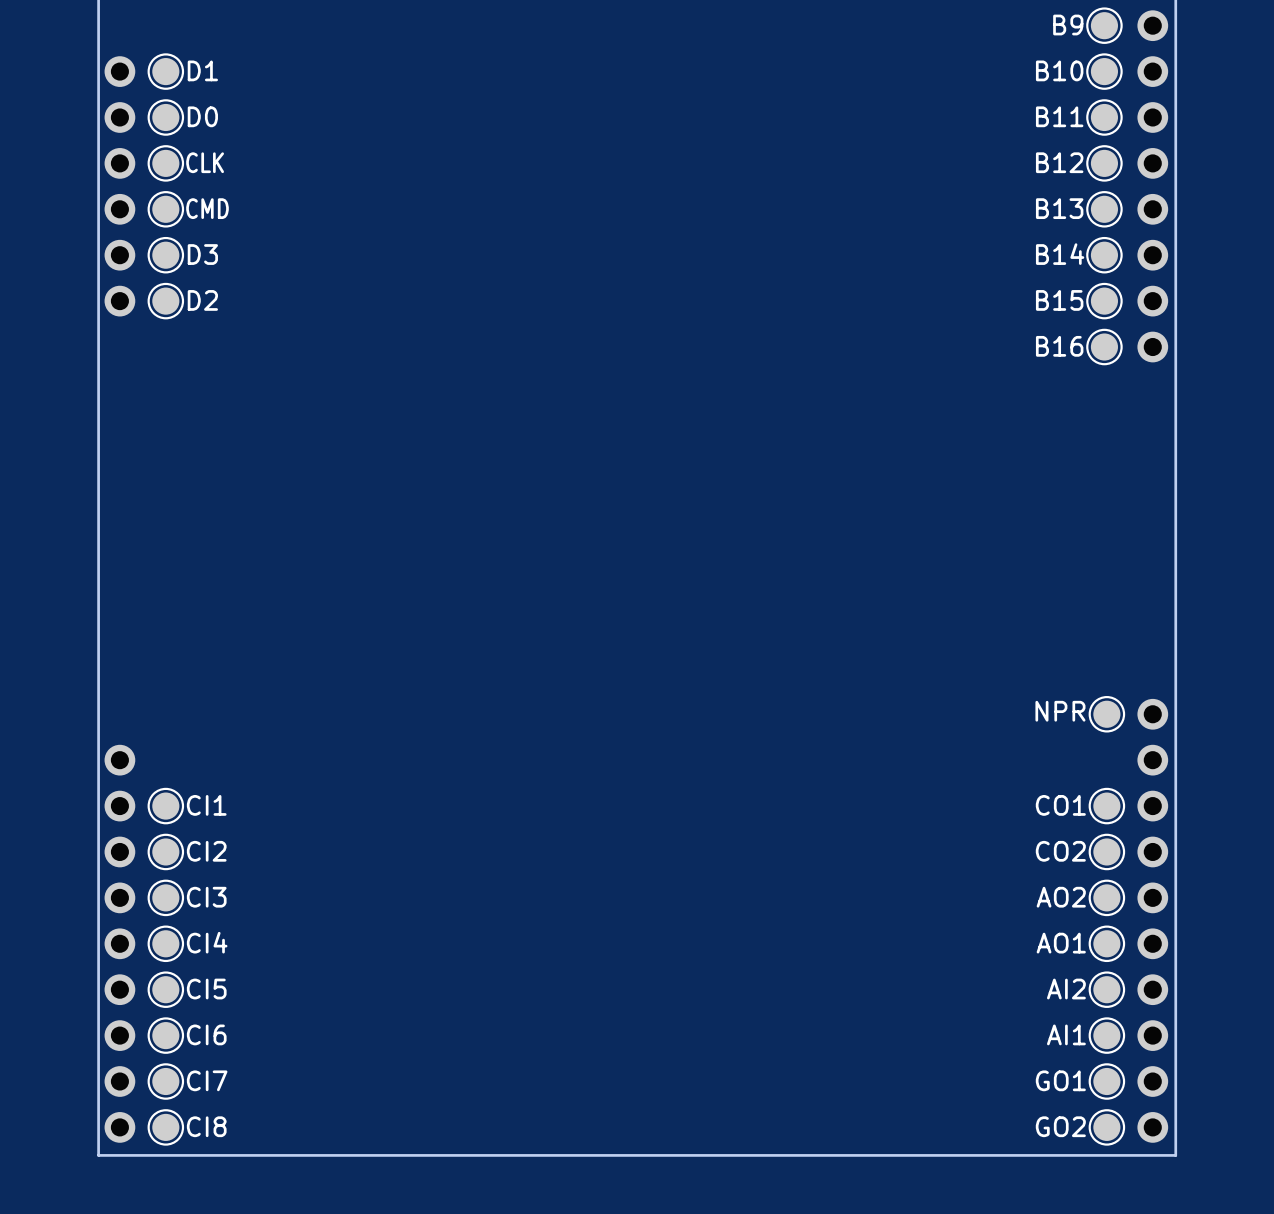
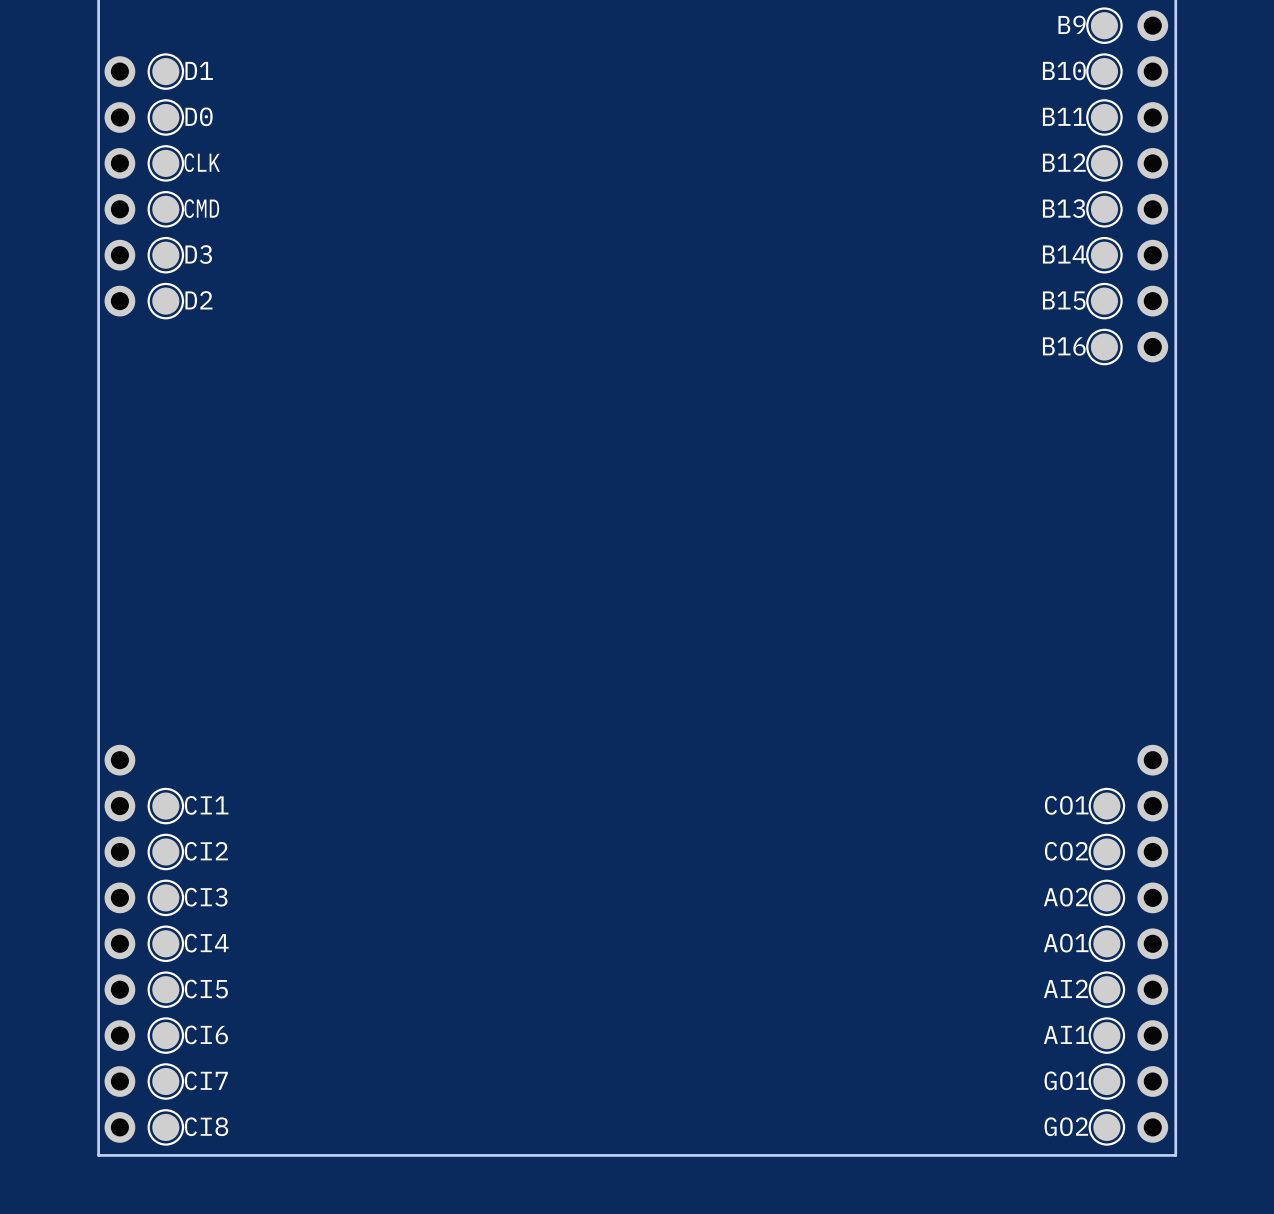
text: NPR (1060, 711) -> none
part: (1106, 714) -> none
part: (1152, 920) -> none

